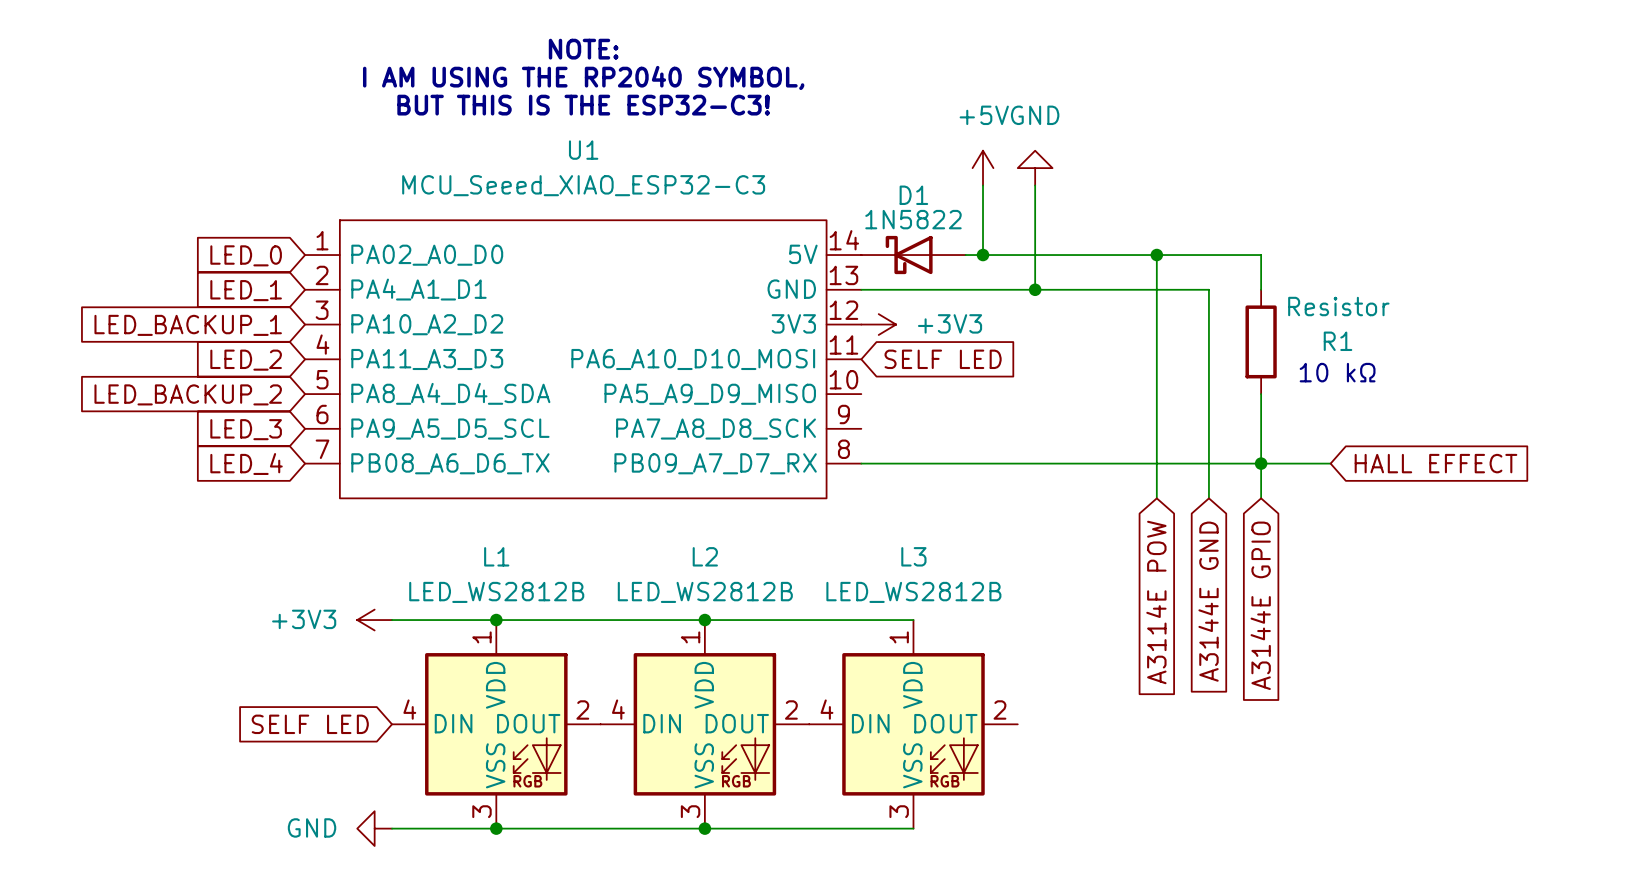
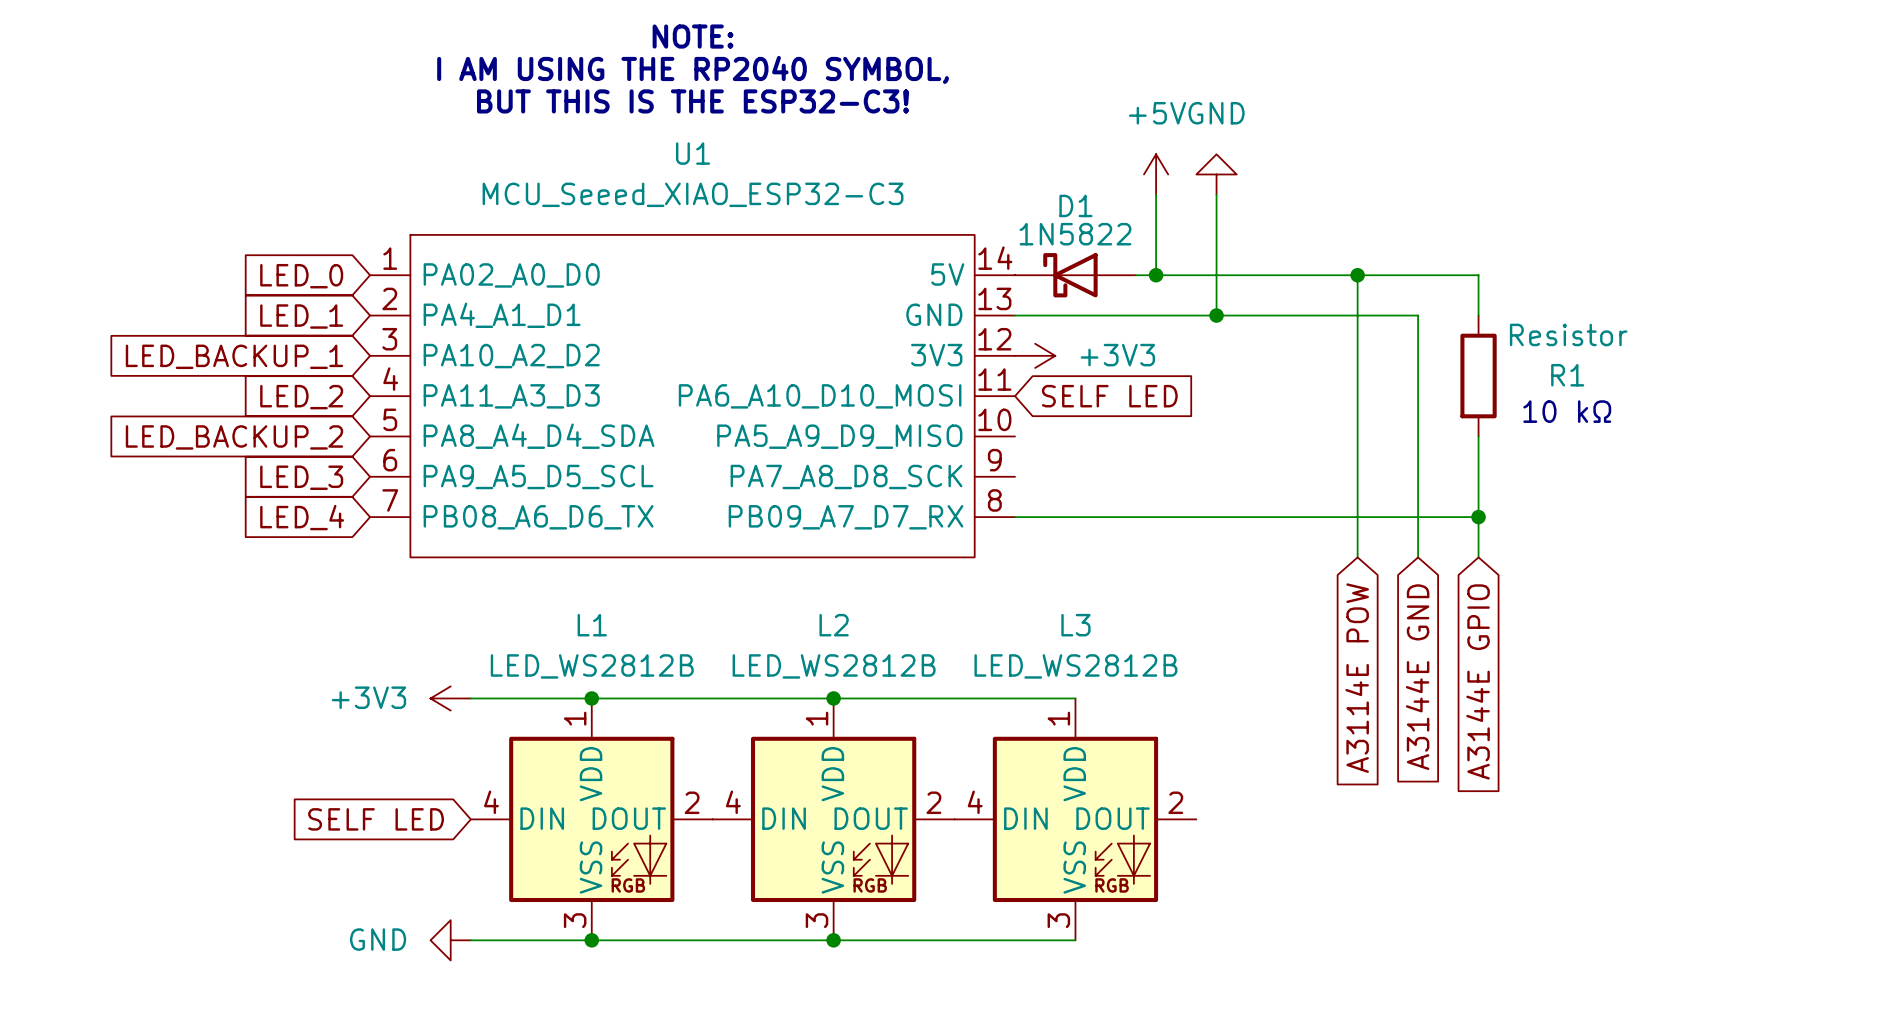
wire: (1261, 463) (1330, 463) -> none
global label: HALL EFFECT (1435, 463) -> none

